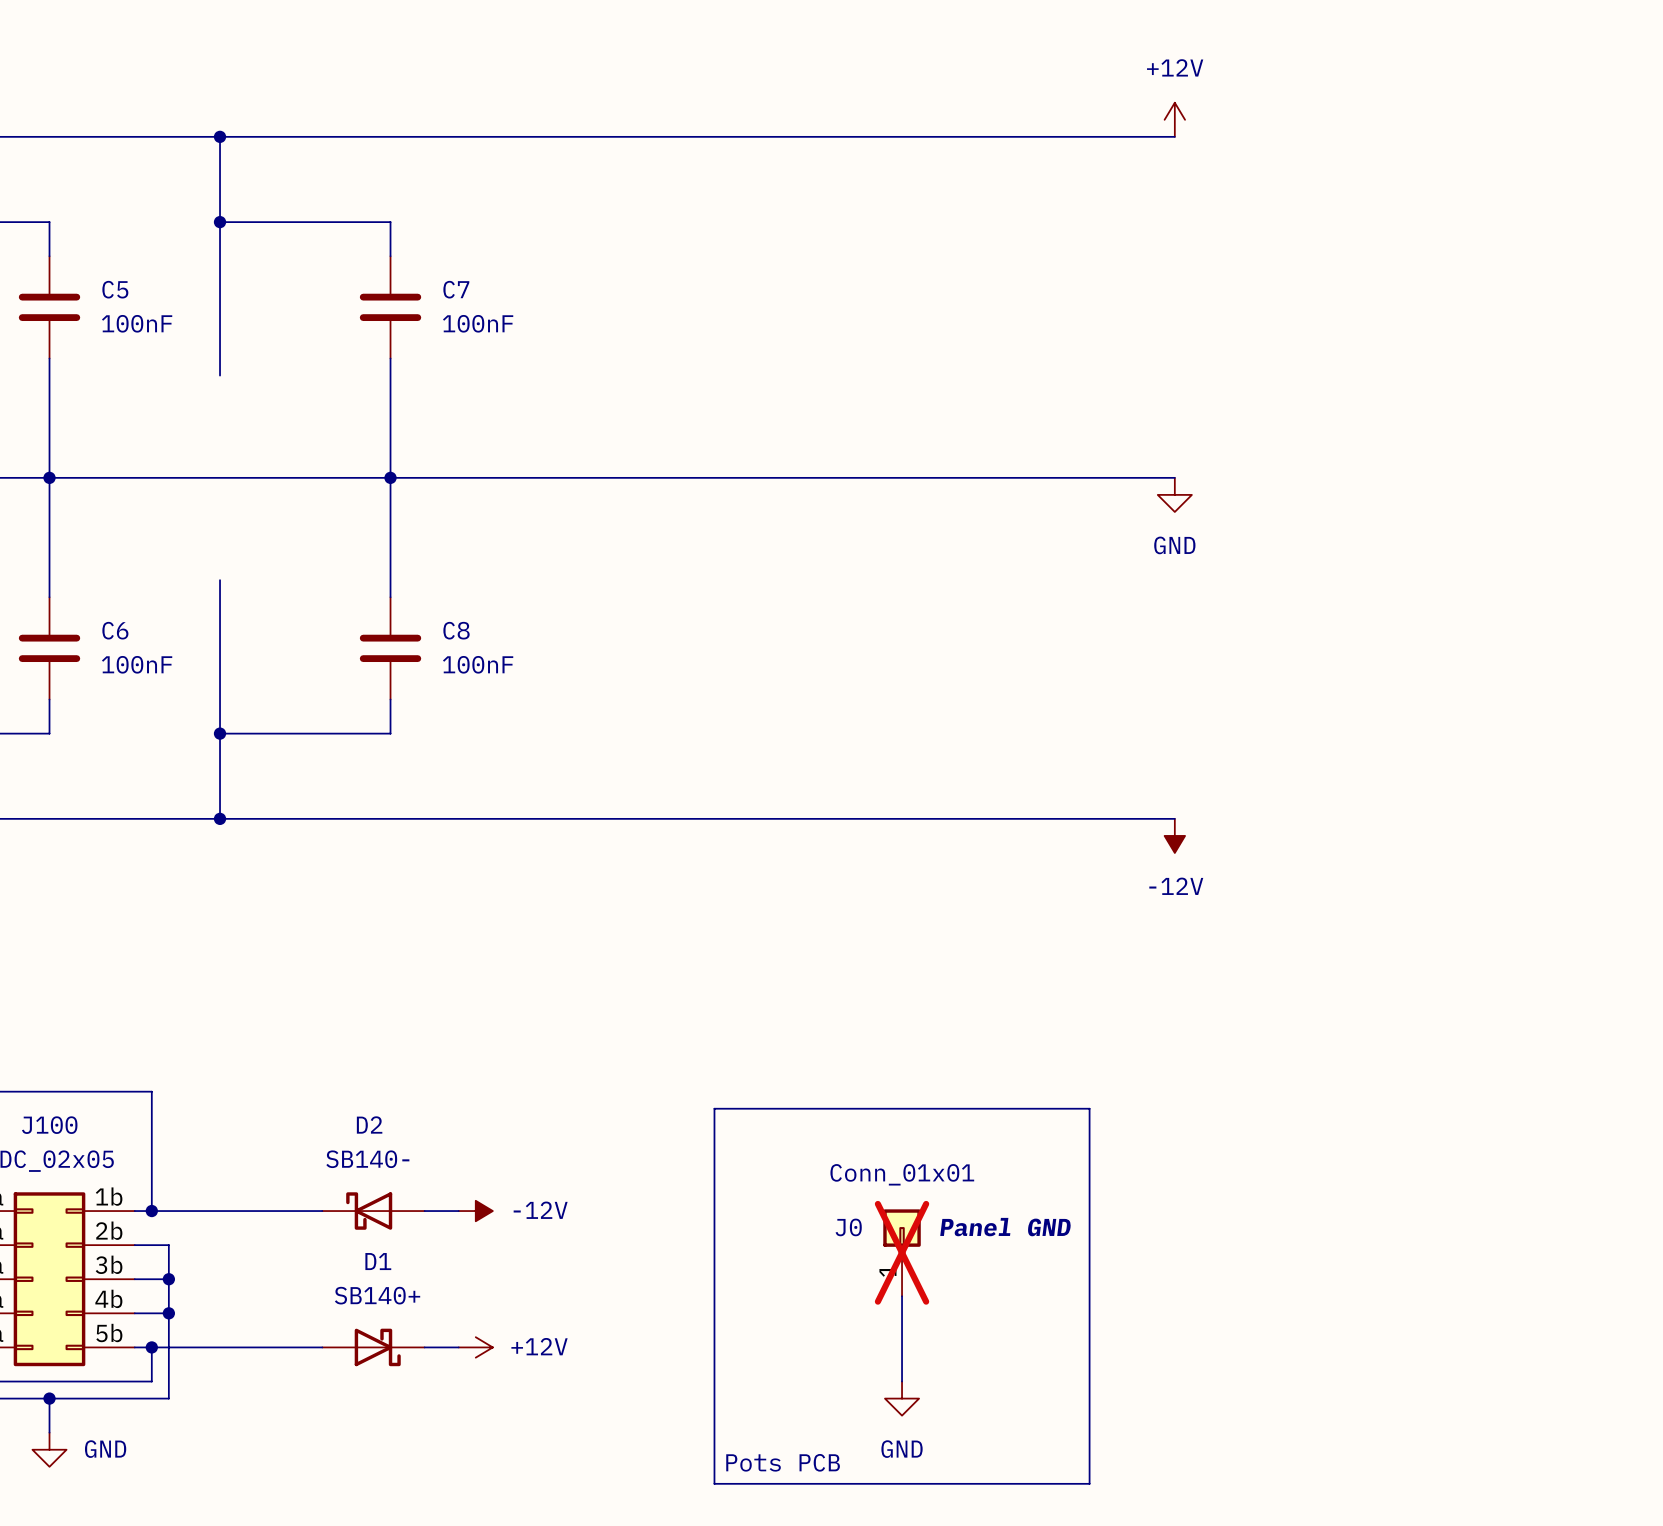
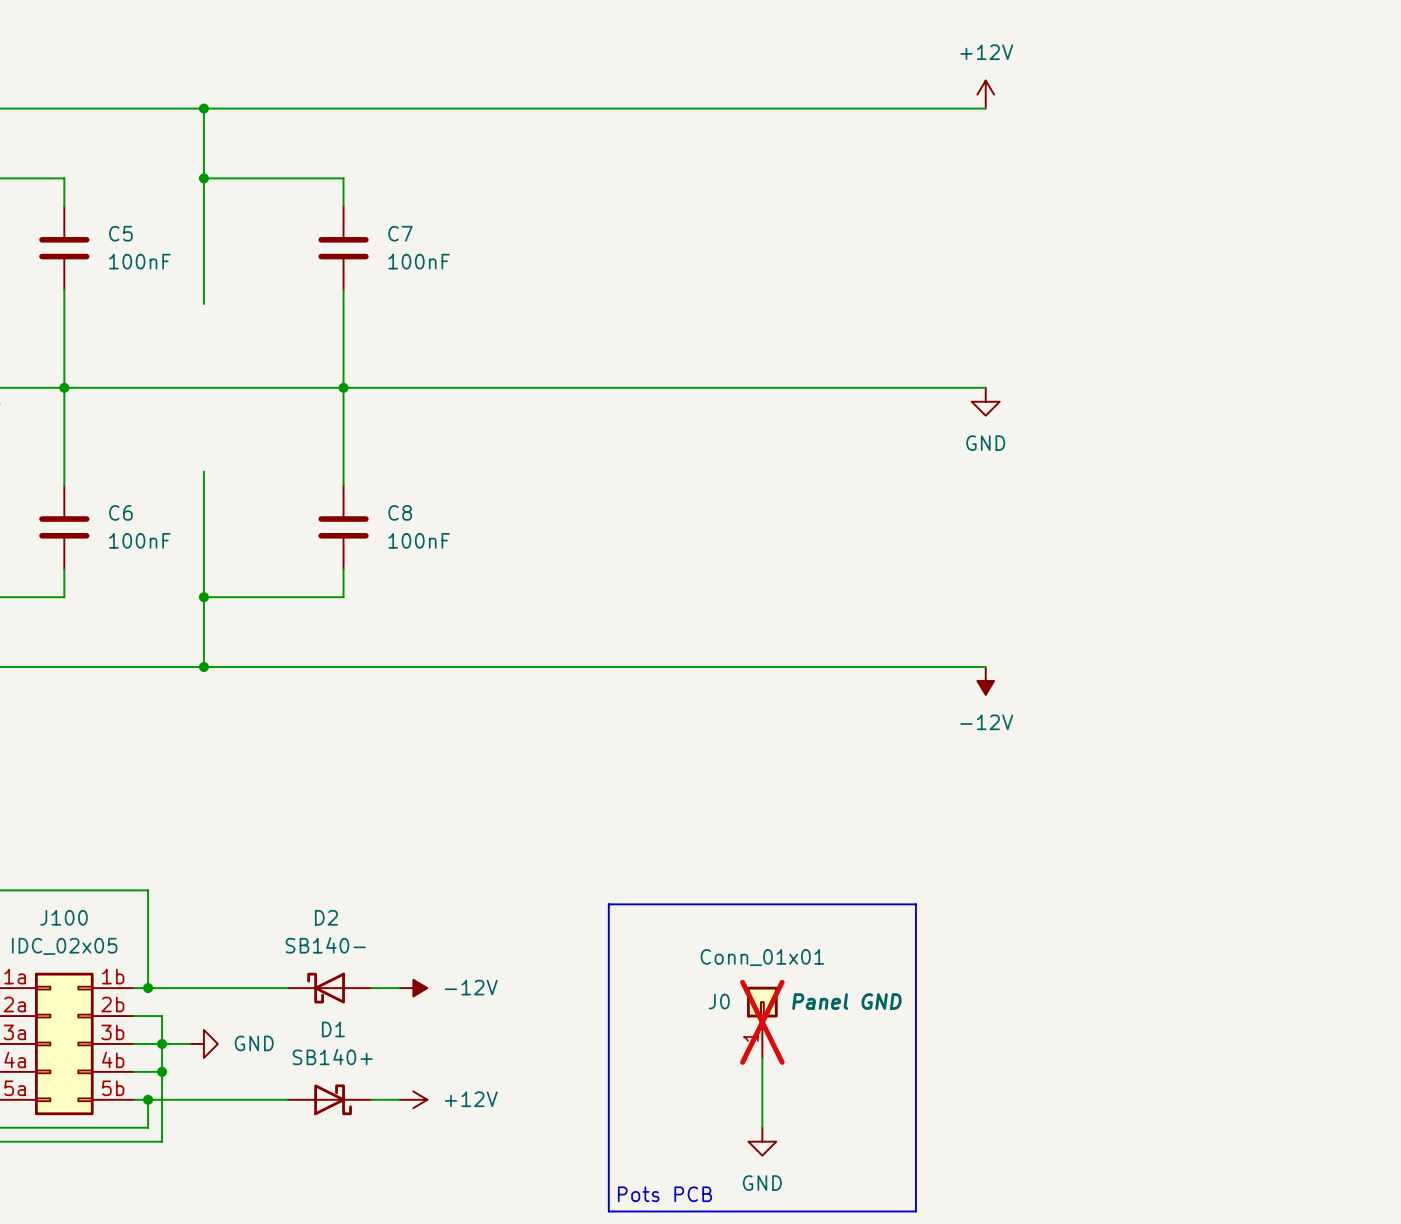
wire: none -> (162, 1043) (189, 1043)
wire: (49, 1398) (49, 1432) -> none
junction: (49, 1398) -> none
power symbol rotation: 0° (49, 1449) -> 90° counterclockwise (203, 1043)
power symbol position: GND (49, 1449) -> GND (203, 1043)

